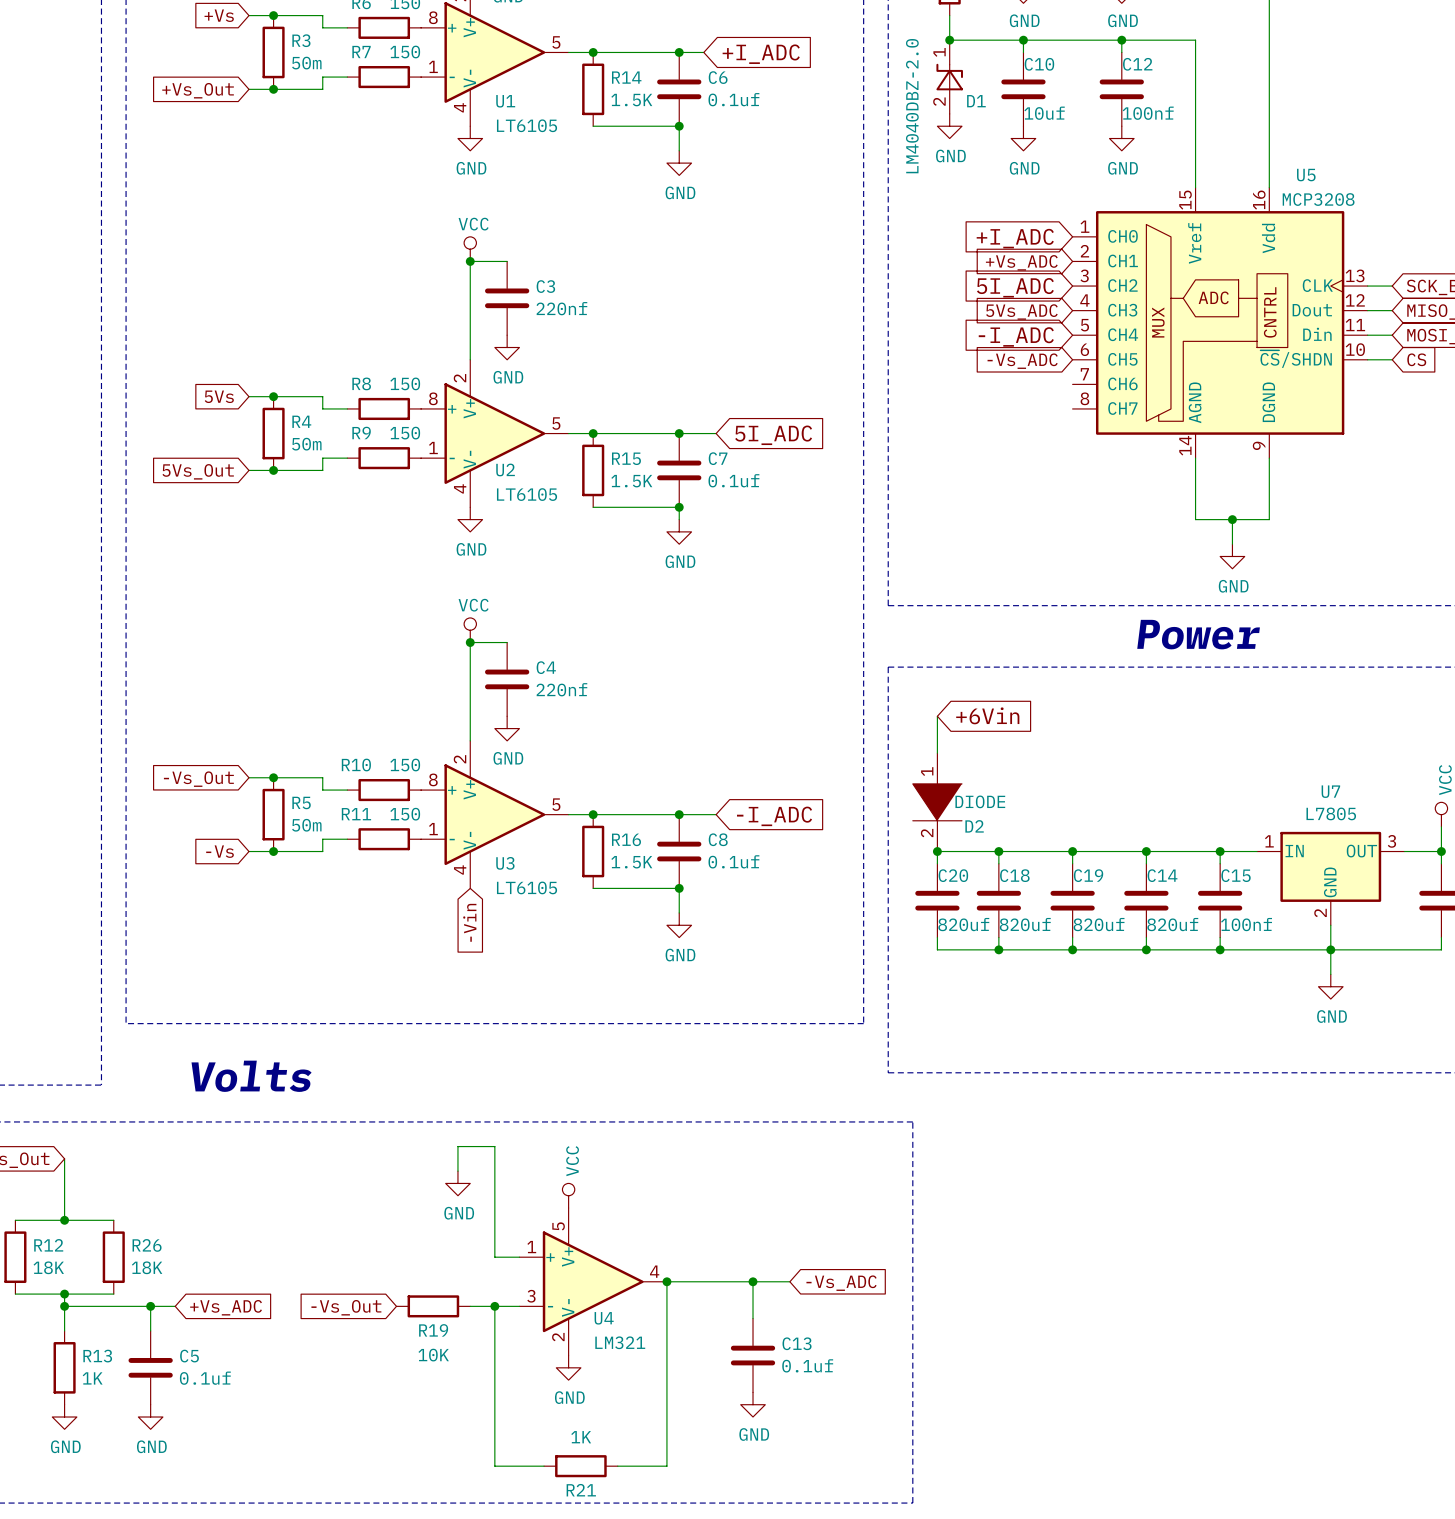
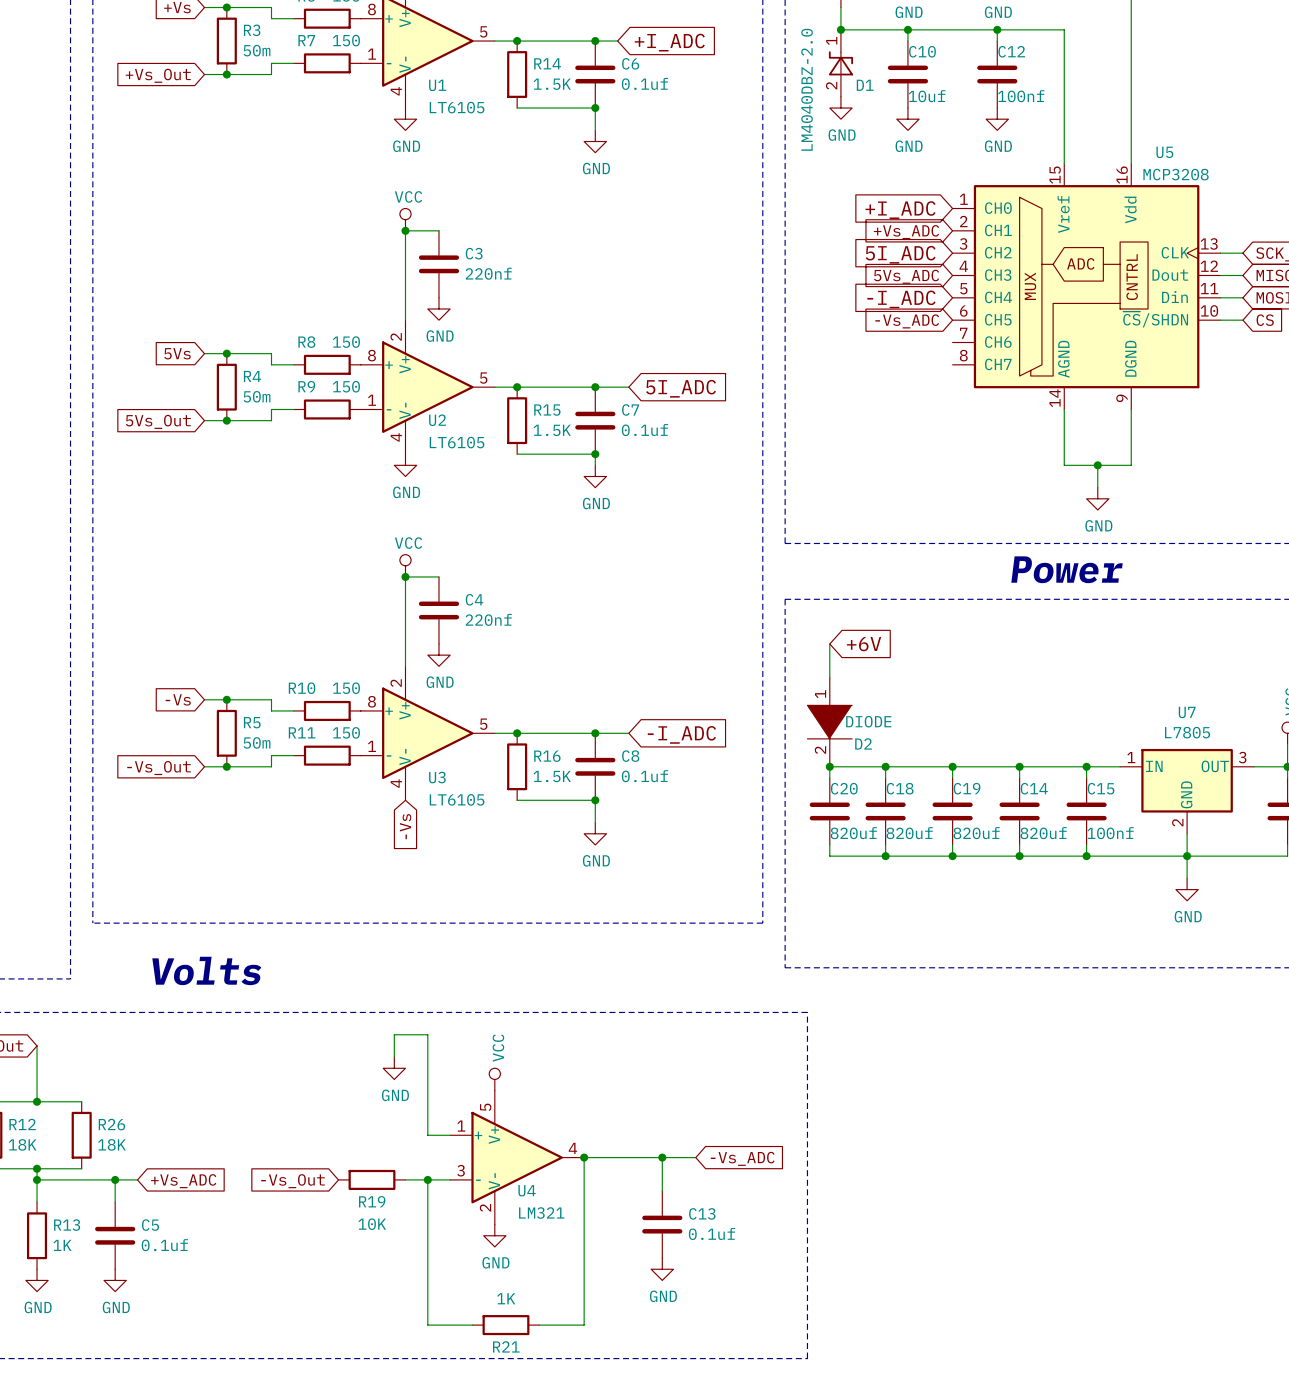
global label: +6Vin (987, 715) -> +6V (864, 644)
global label: -Vs_Out (198, 779) -> -Vs (178, 699)
global label: -Vs (220, 851) -> -Vs_Out (158, 768)
global label: -Vin (469, 922) -> -Vs (405, 826)

